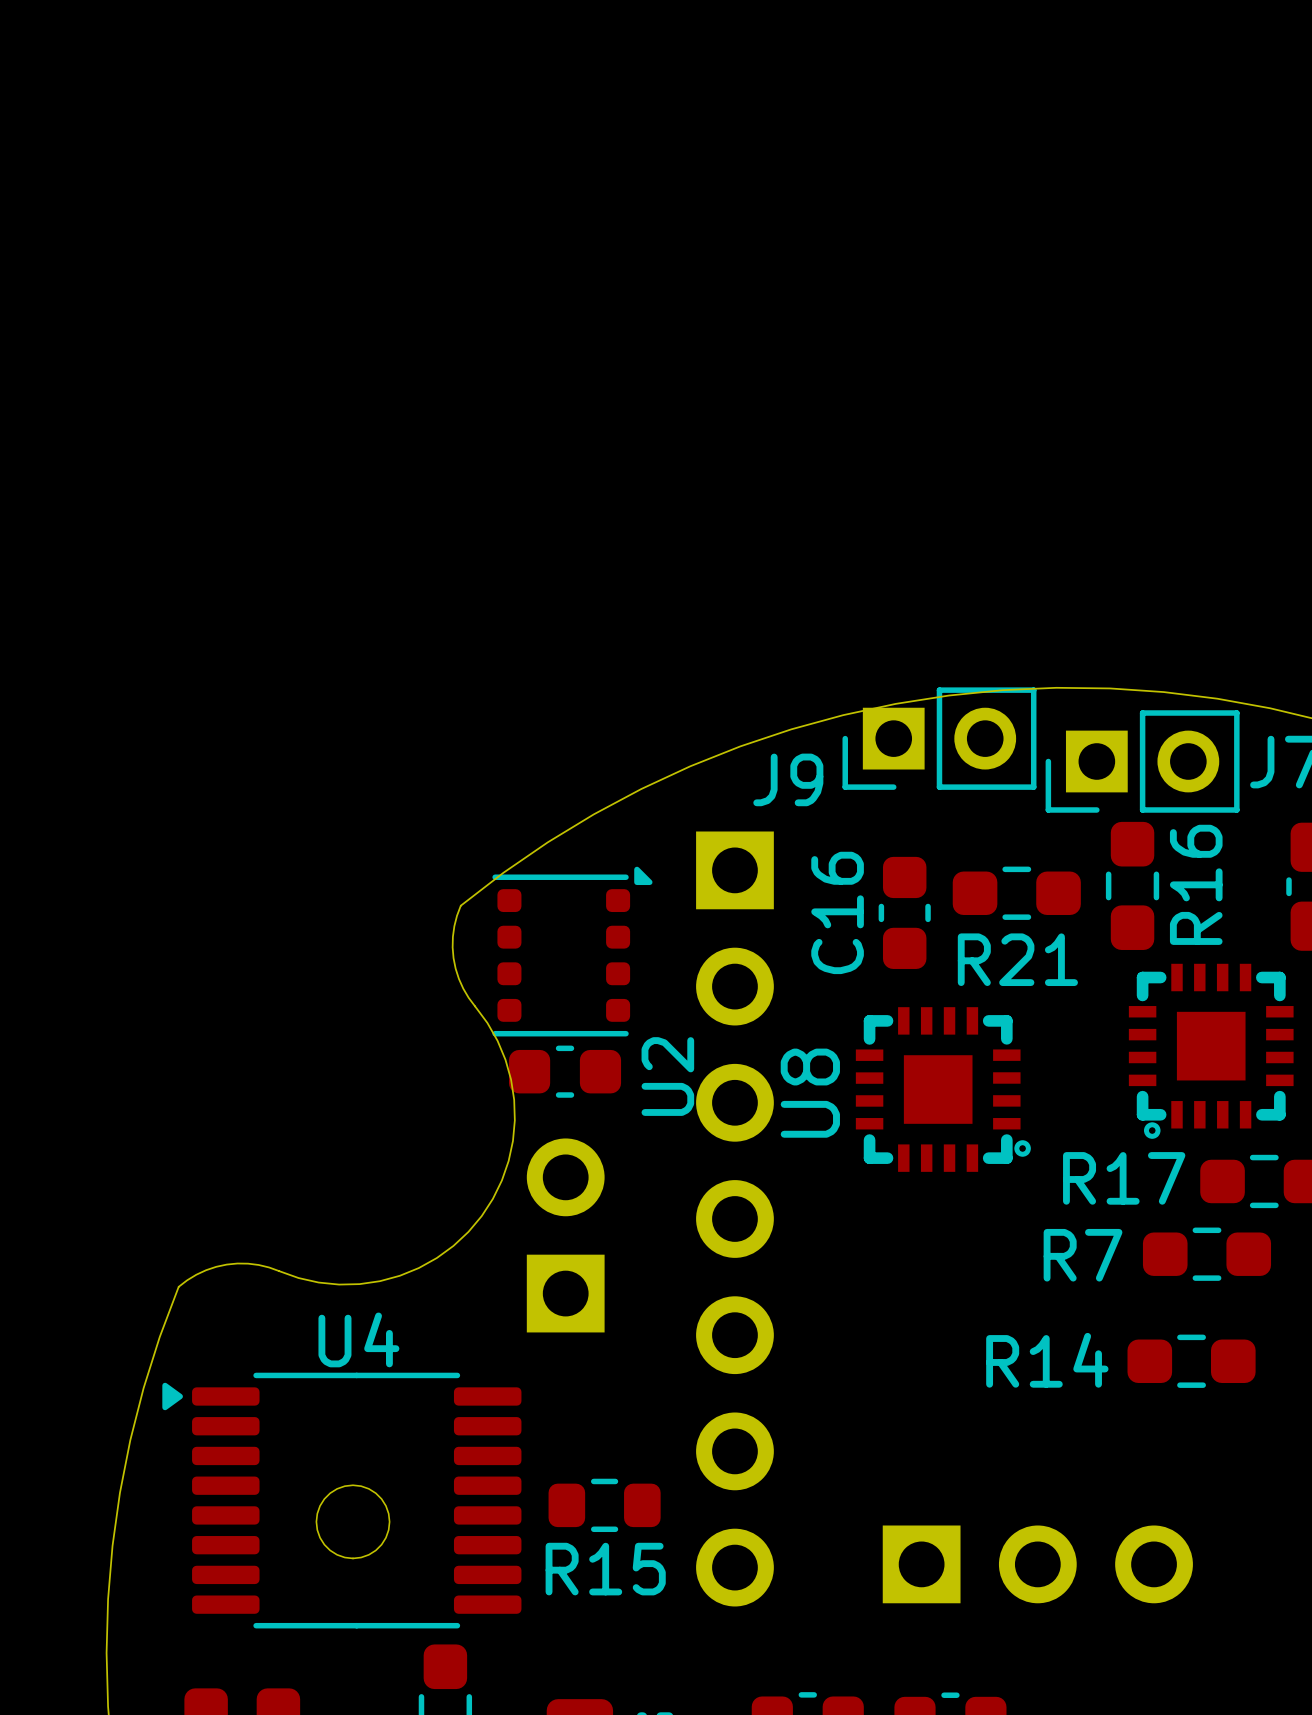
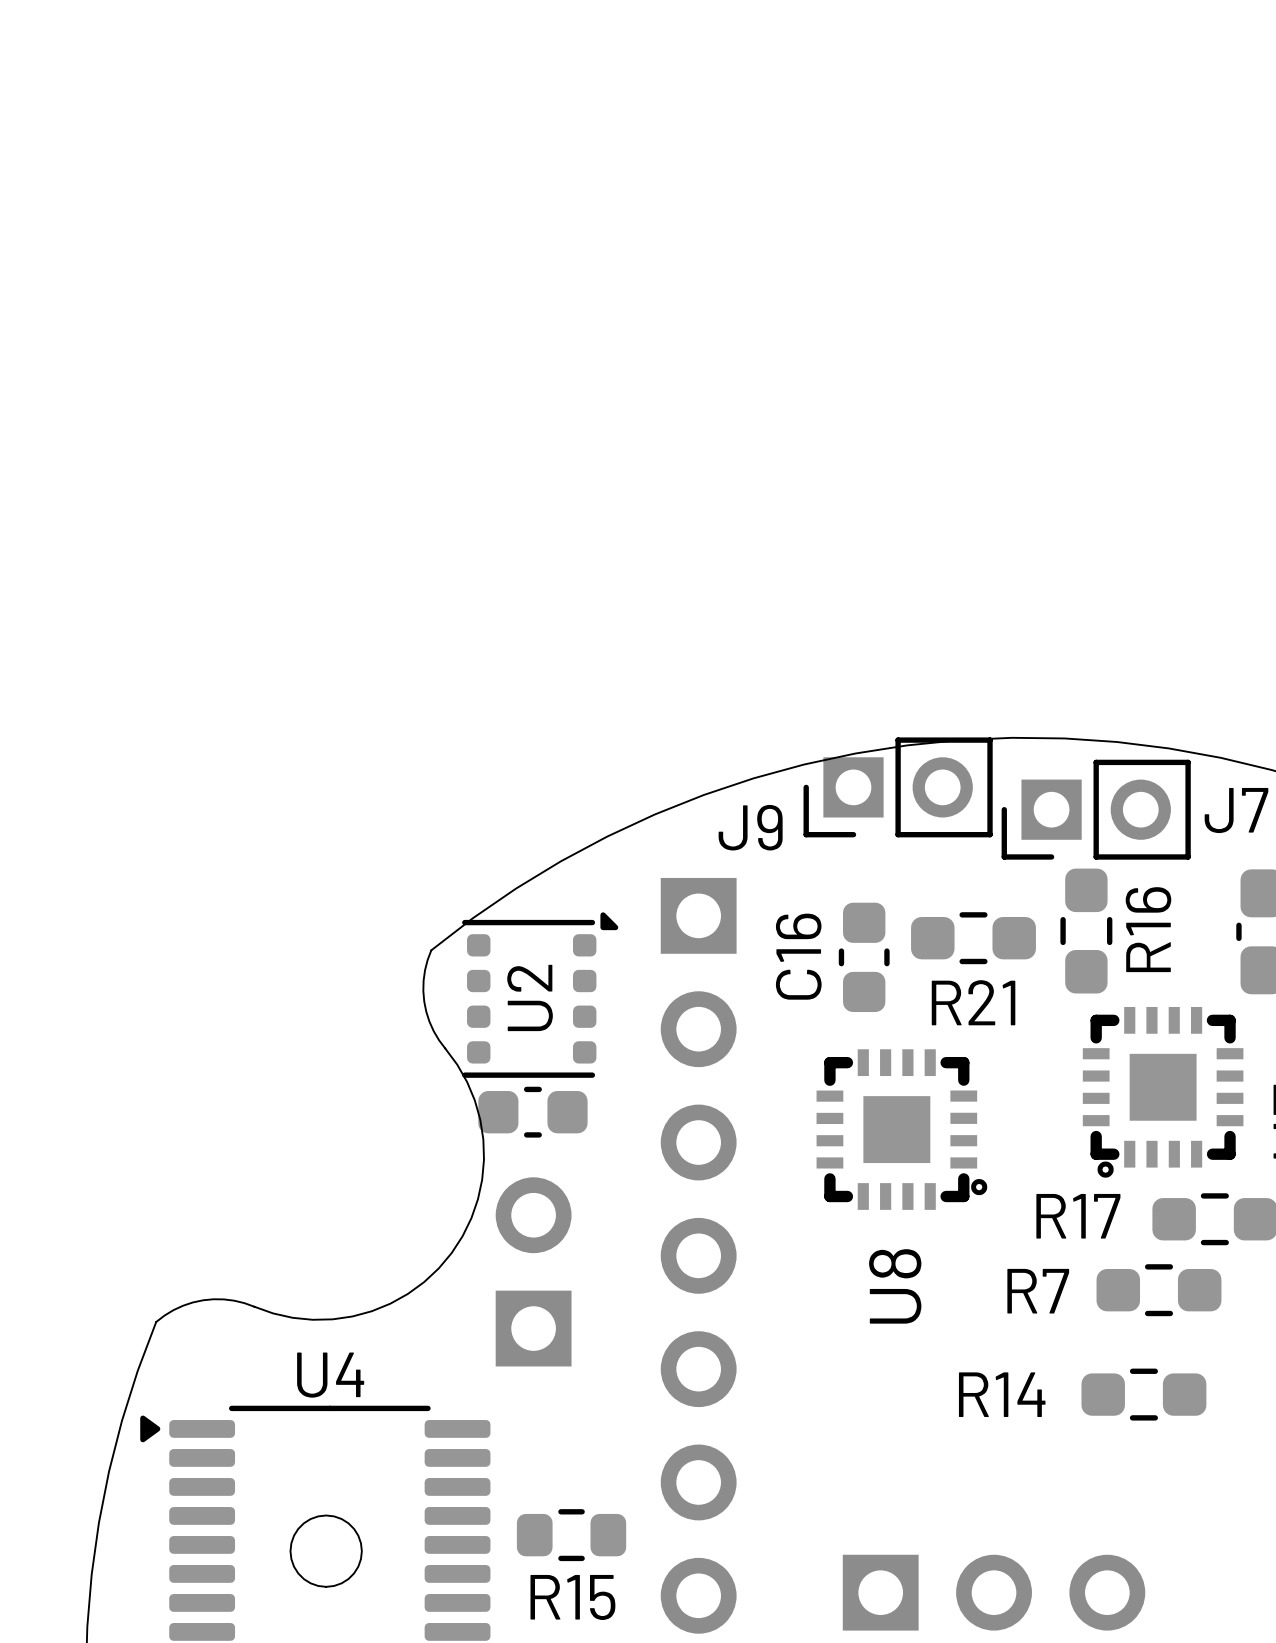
U2 name position: U2 (667, 1076) -> U2 (530, 997)
U8 name position: U8 (810, 1093) -> U8 (895, 1286)

